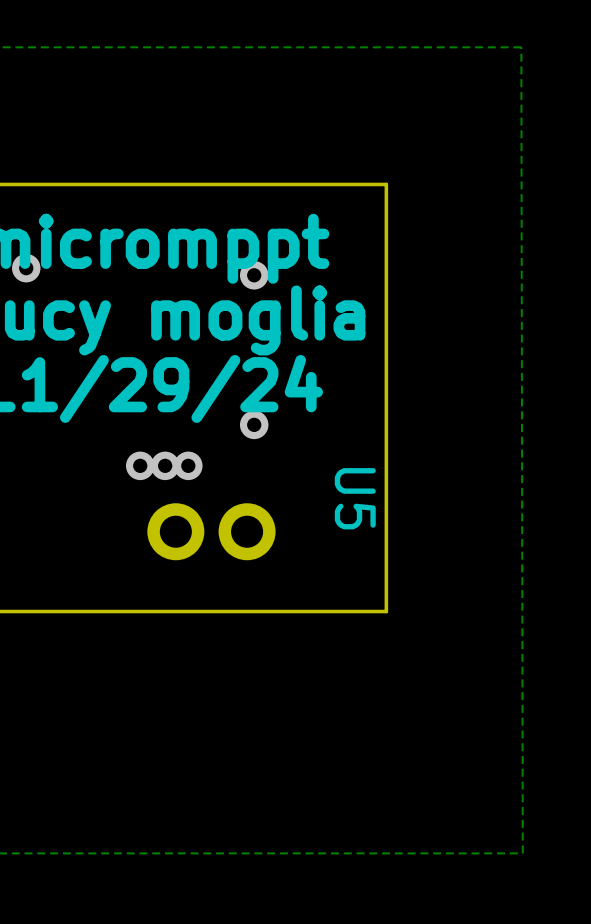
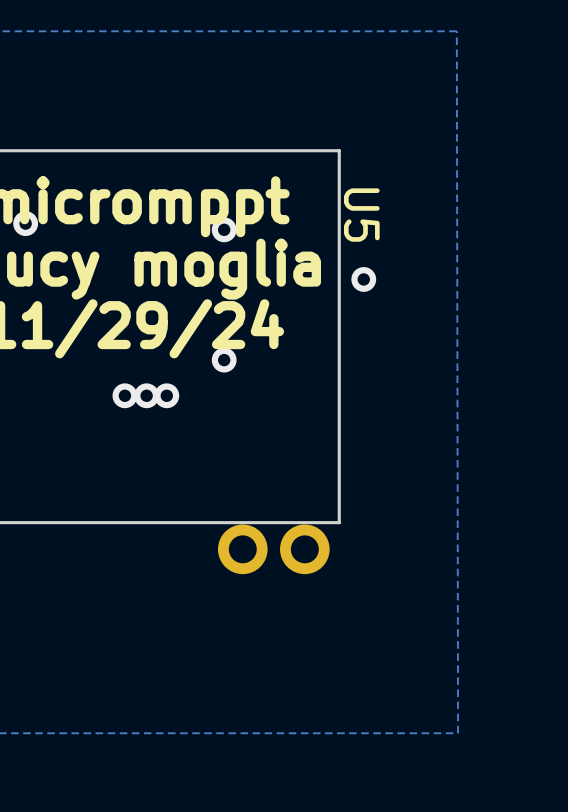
via: none -> (363, 279)
U5 position: (355, 498) -> (361, 215)
part position: (211, 531) -> (273, 549)

